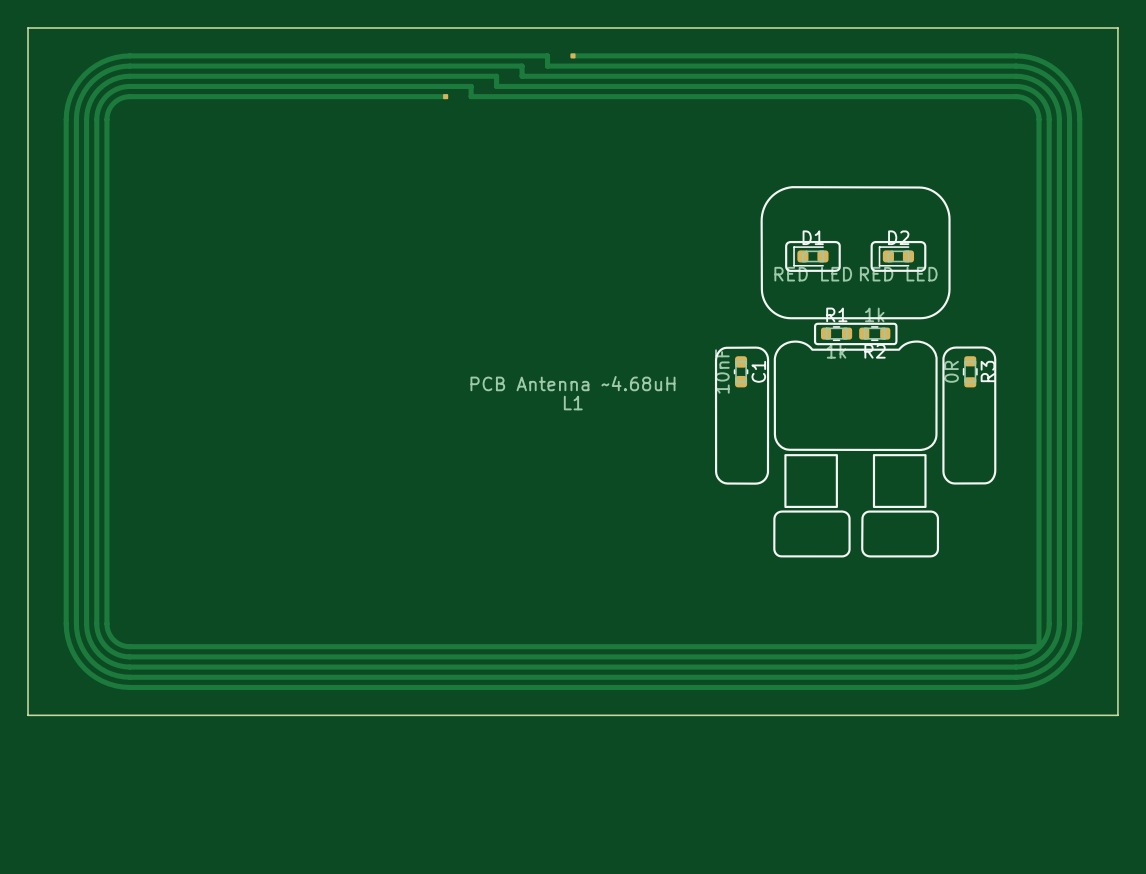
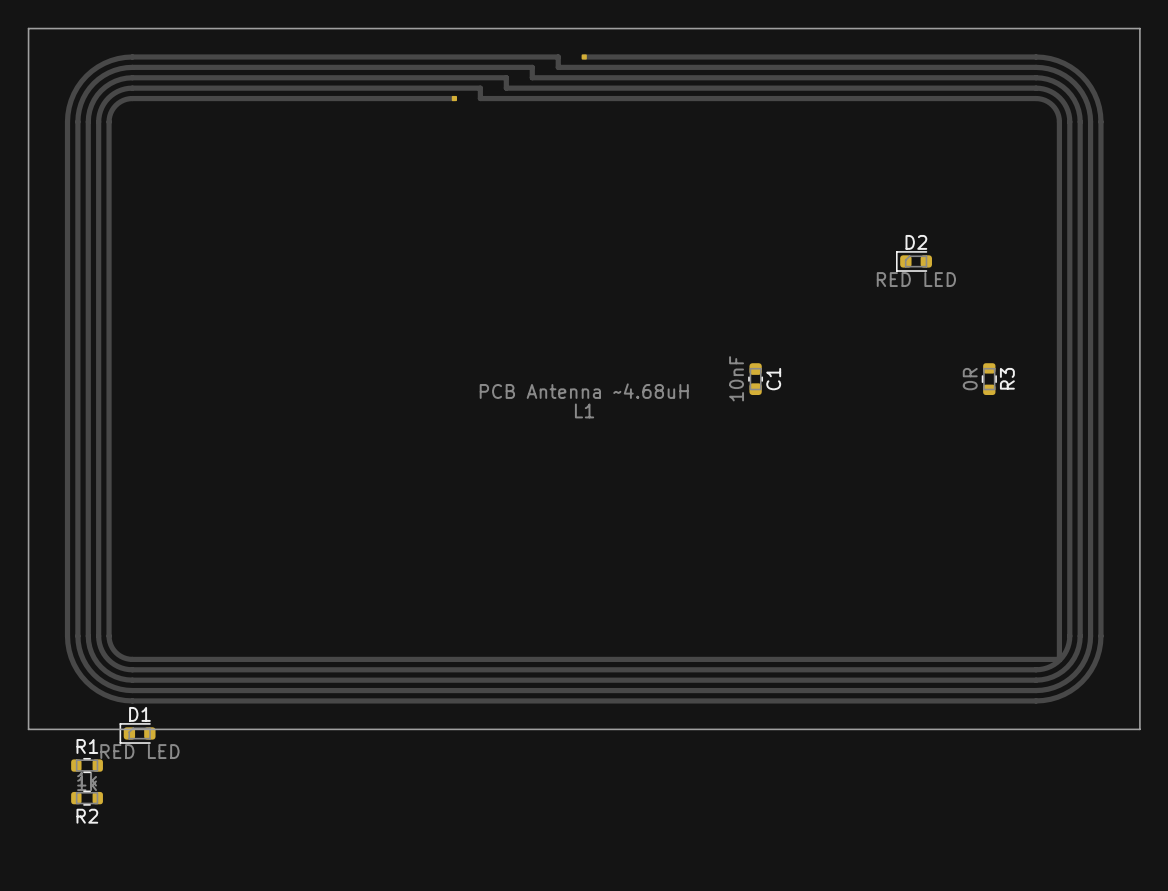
drawing: [714, 186, 997, 558] -> none
D1 position: (810, 256) -> (137, 733)
R1 position: (836, 333) -> (87, 765)
R2 position: (874, 333) -> (87, 798)

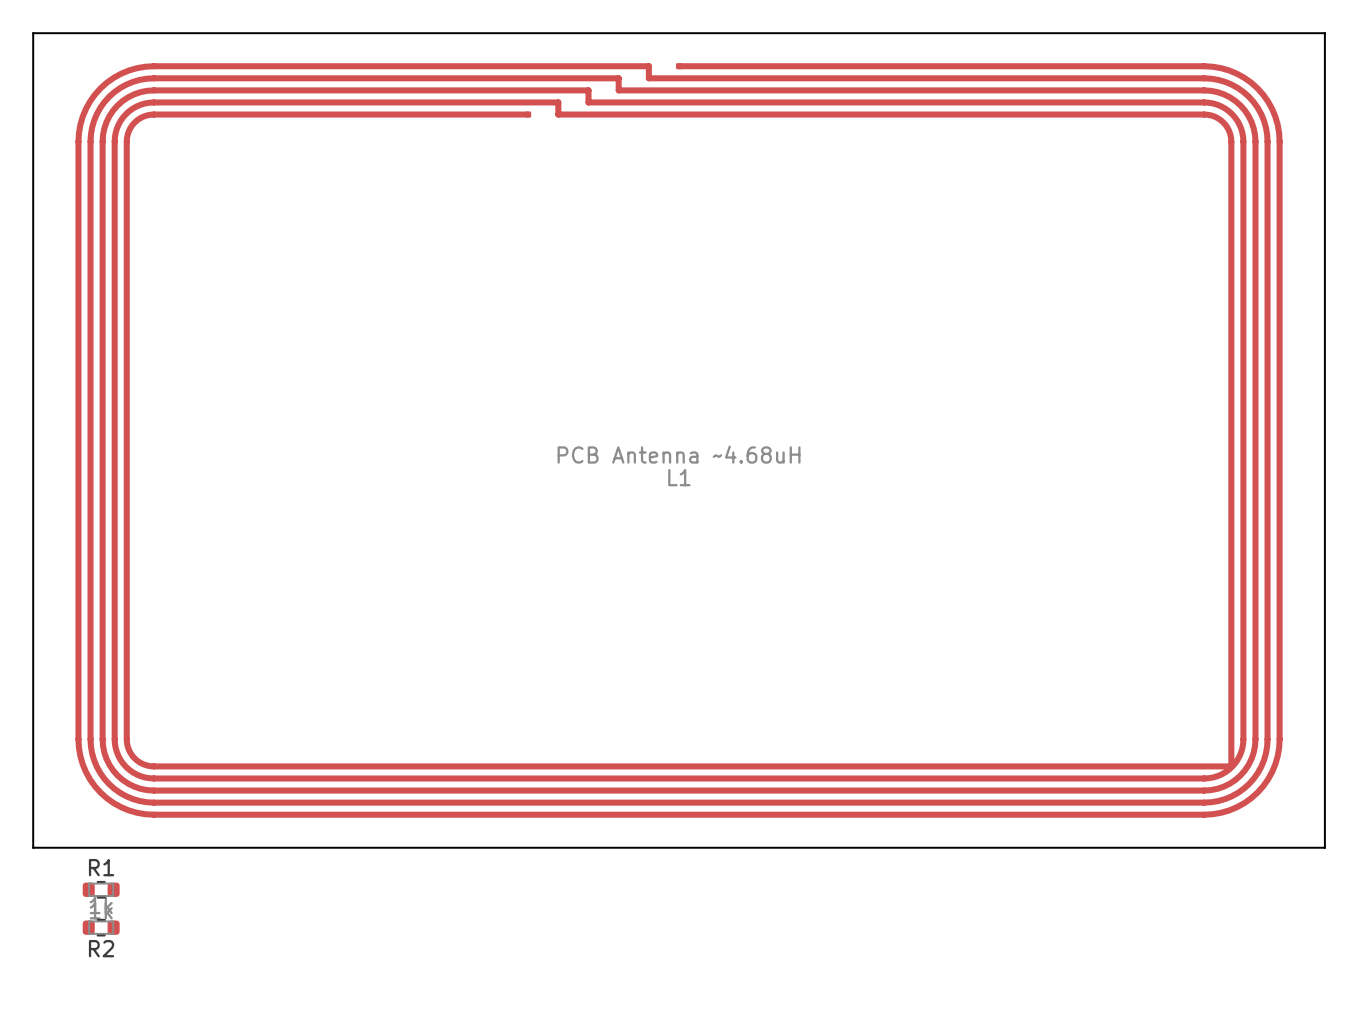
D2: RED LED (914, 261) -> none
C1: 10nF (755, 379) -> none
R3: 0R (989, 379) -> none
D1: RED LED (137, 733) -> none

